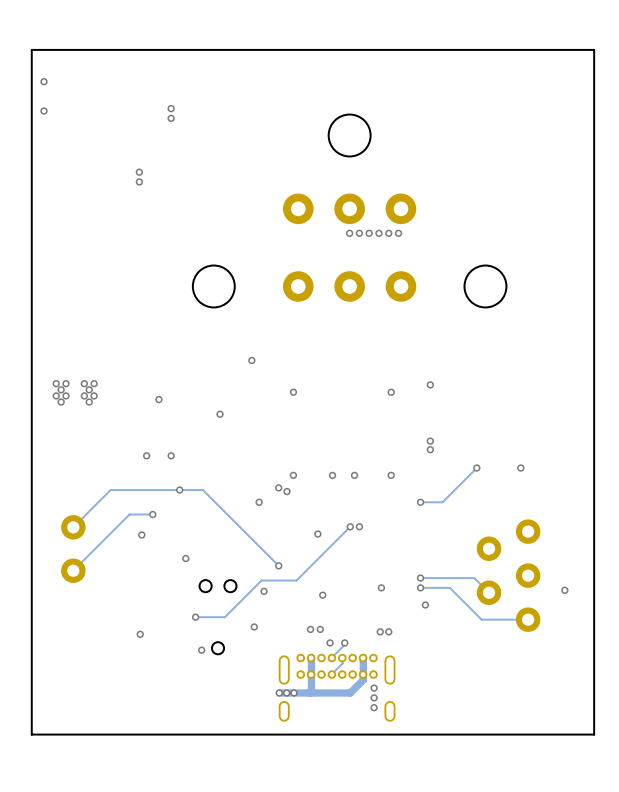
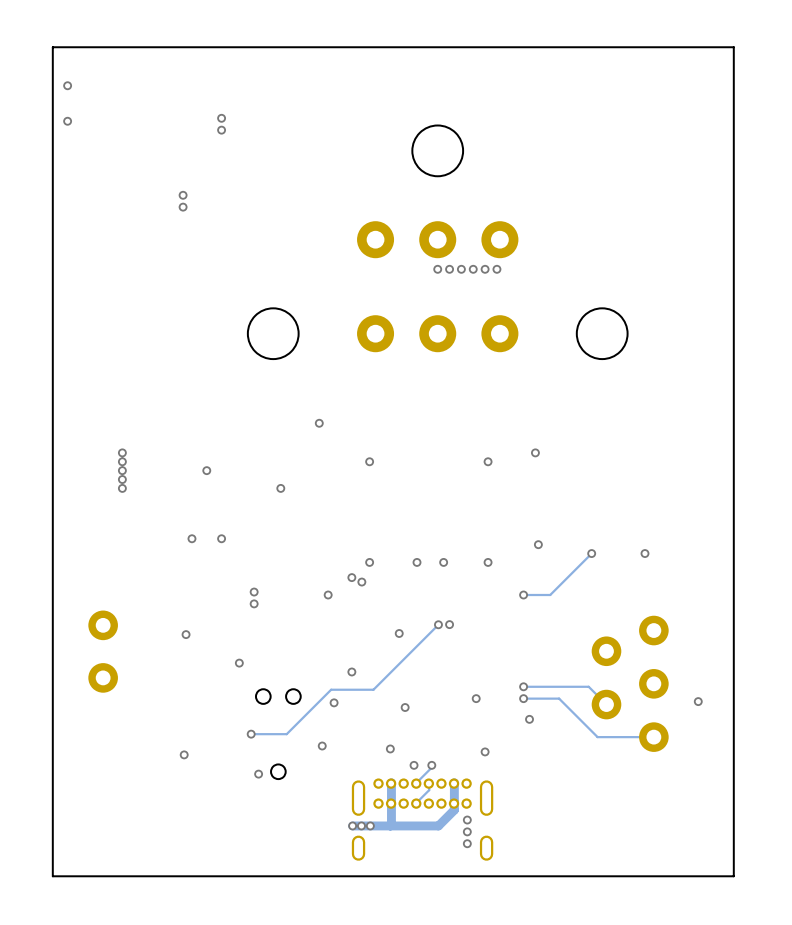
via: (56, 383) -> none
via: (66, 383) -> none
via: (84, 383) -> none
via: (94, 383) -> none
via: none -> (122, 452)
via: (61, 389) -> none
via: (89, 389) -> none
via: none -> (122, 461)
via: (56, 395) -> none
via: (66, 395) -> none
via: (84, 395) -> none
via: (94, 395) -> none
via: none -> (122, 470)
via: (61, 402) -> none
via: (89, 402) -> none
via: none -> (122, 479)
via: none -> (122, 488)
via: (430, 441) -> none
via: (430, 449) -> none
via: none -> (538, 544)
via: (179, 490) -> none
via: none -> (254, 592)
via: none -> (254, 603)
track: (152, 514) (129, 514) (73, 570) -> none
via: (152, 514) -> none
track: (73, 527) (110, 490) (202, 490) (278, 565) -> none
via: (320, 629) -> none
via: (380, 631) -> none

